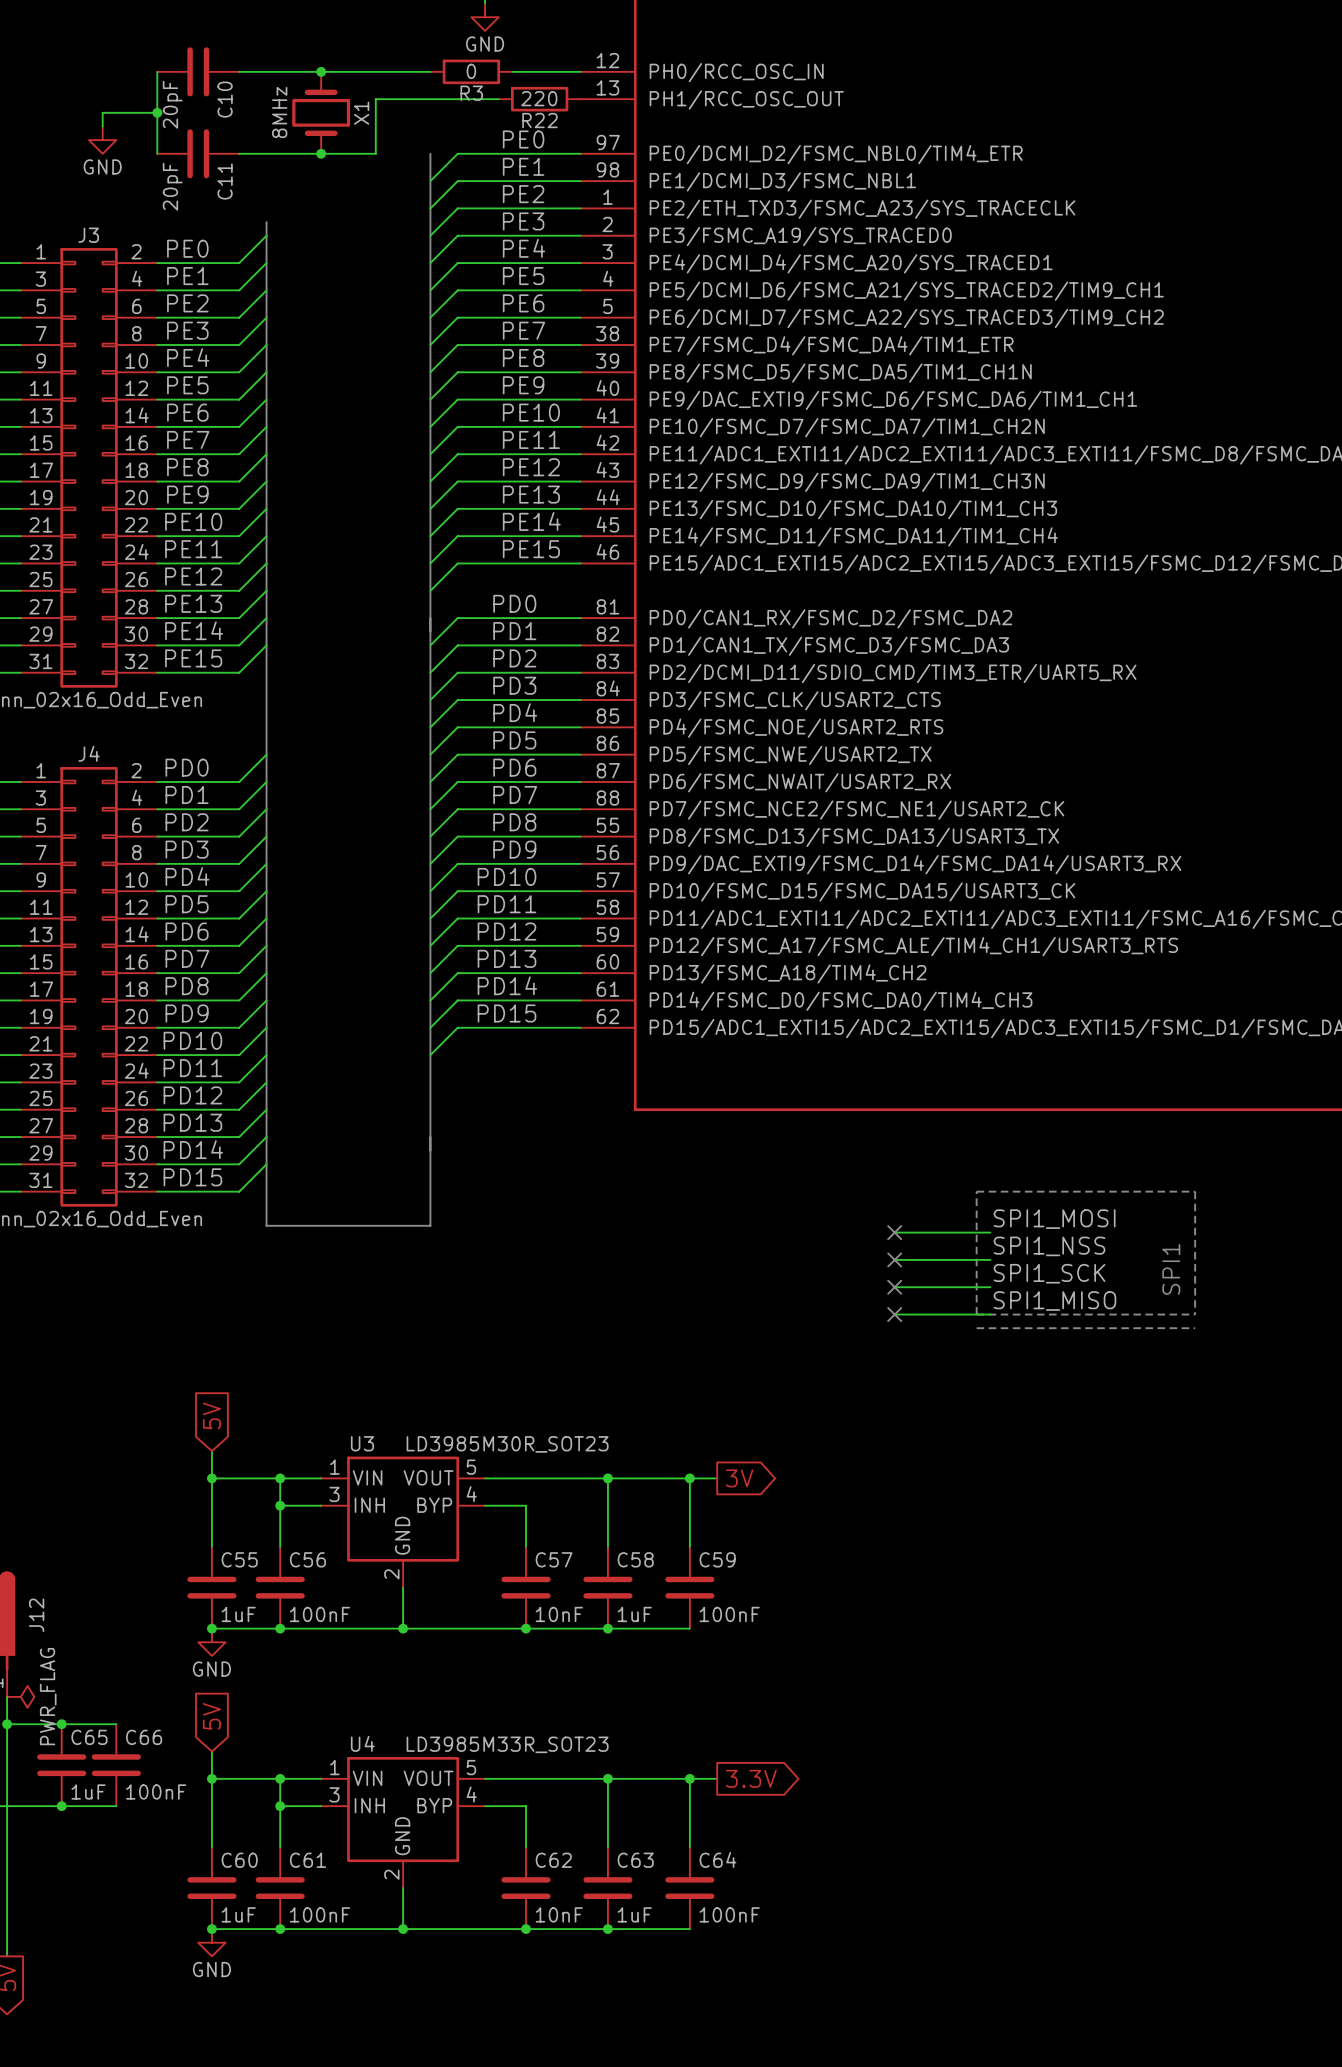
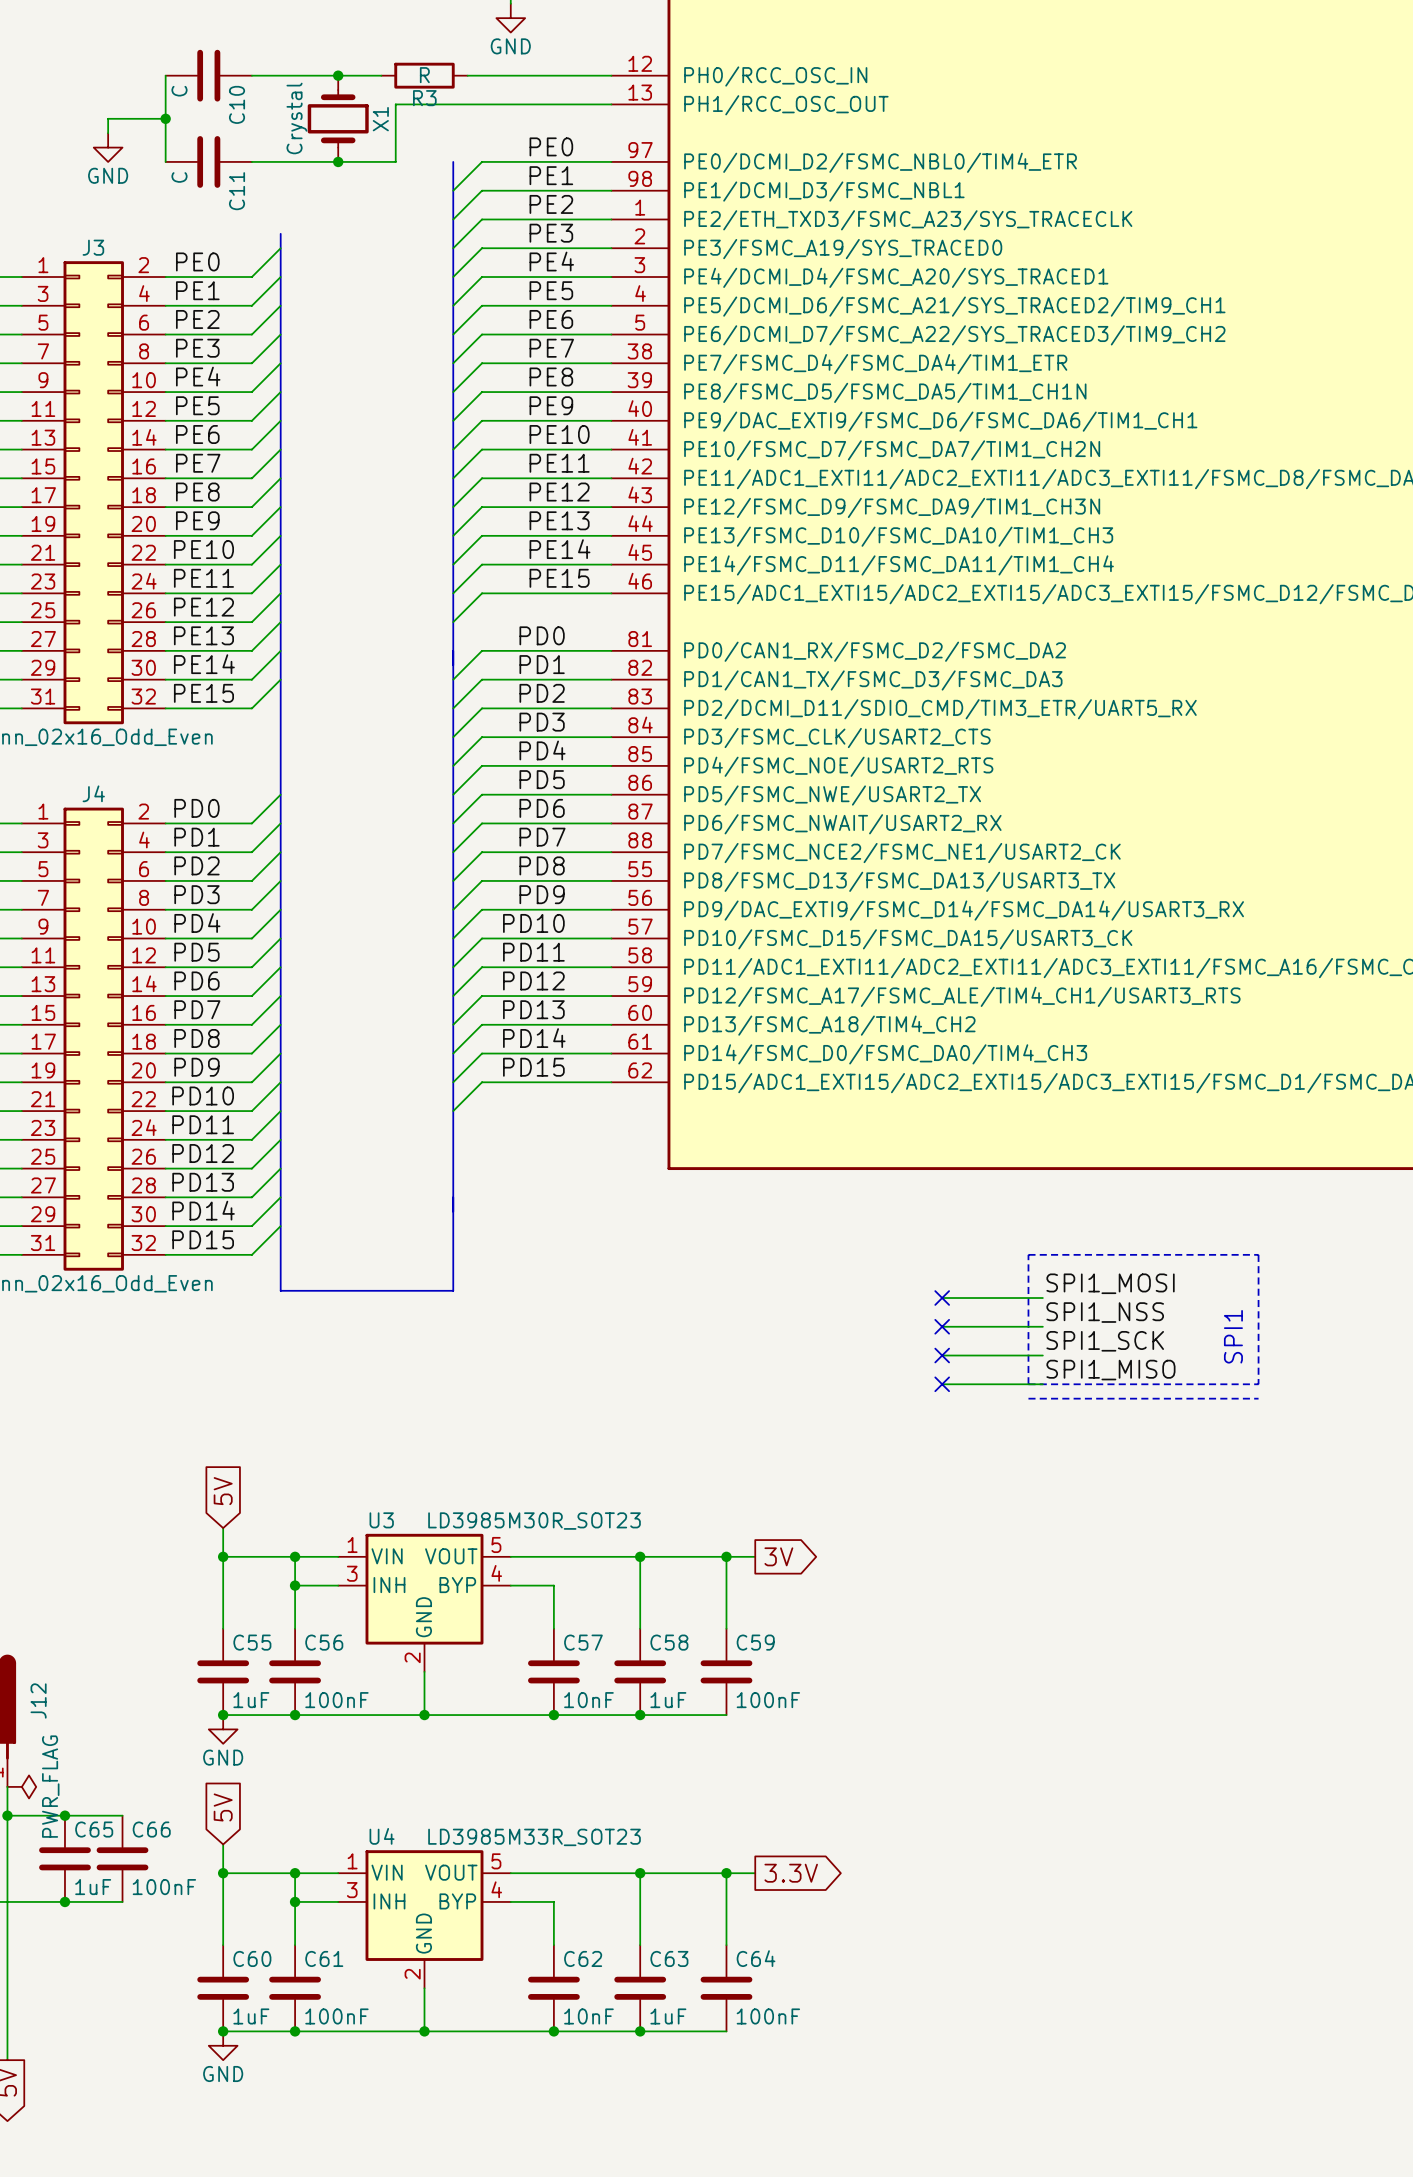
wire: (362, 71) (430, 71) -> (467, 75) (539, 75)
R3 position: (471, 71) -> (424, 75)
R3 value: 0 (471, 71) -> R (424, 75)
wire: none -> (525, 104) (611, 104)
R22: 220 (539, 99) -> none
C10 value: 20pF (172, 104) -> C (179, 91)
X1 value: 8MHz (279, 112) -> Crystal (296, 118)
C11 value: 20pF (172, 186) -> C (179, 177)

